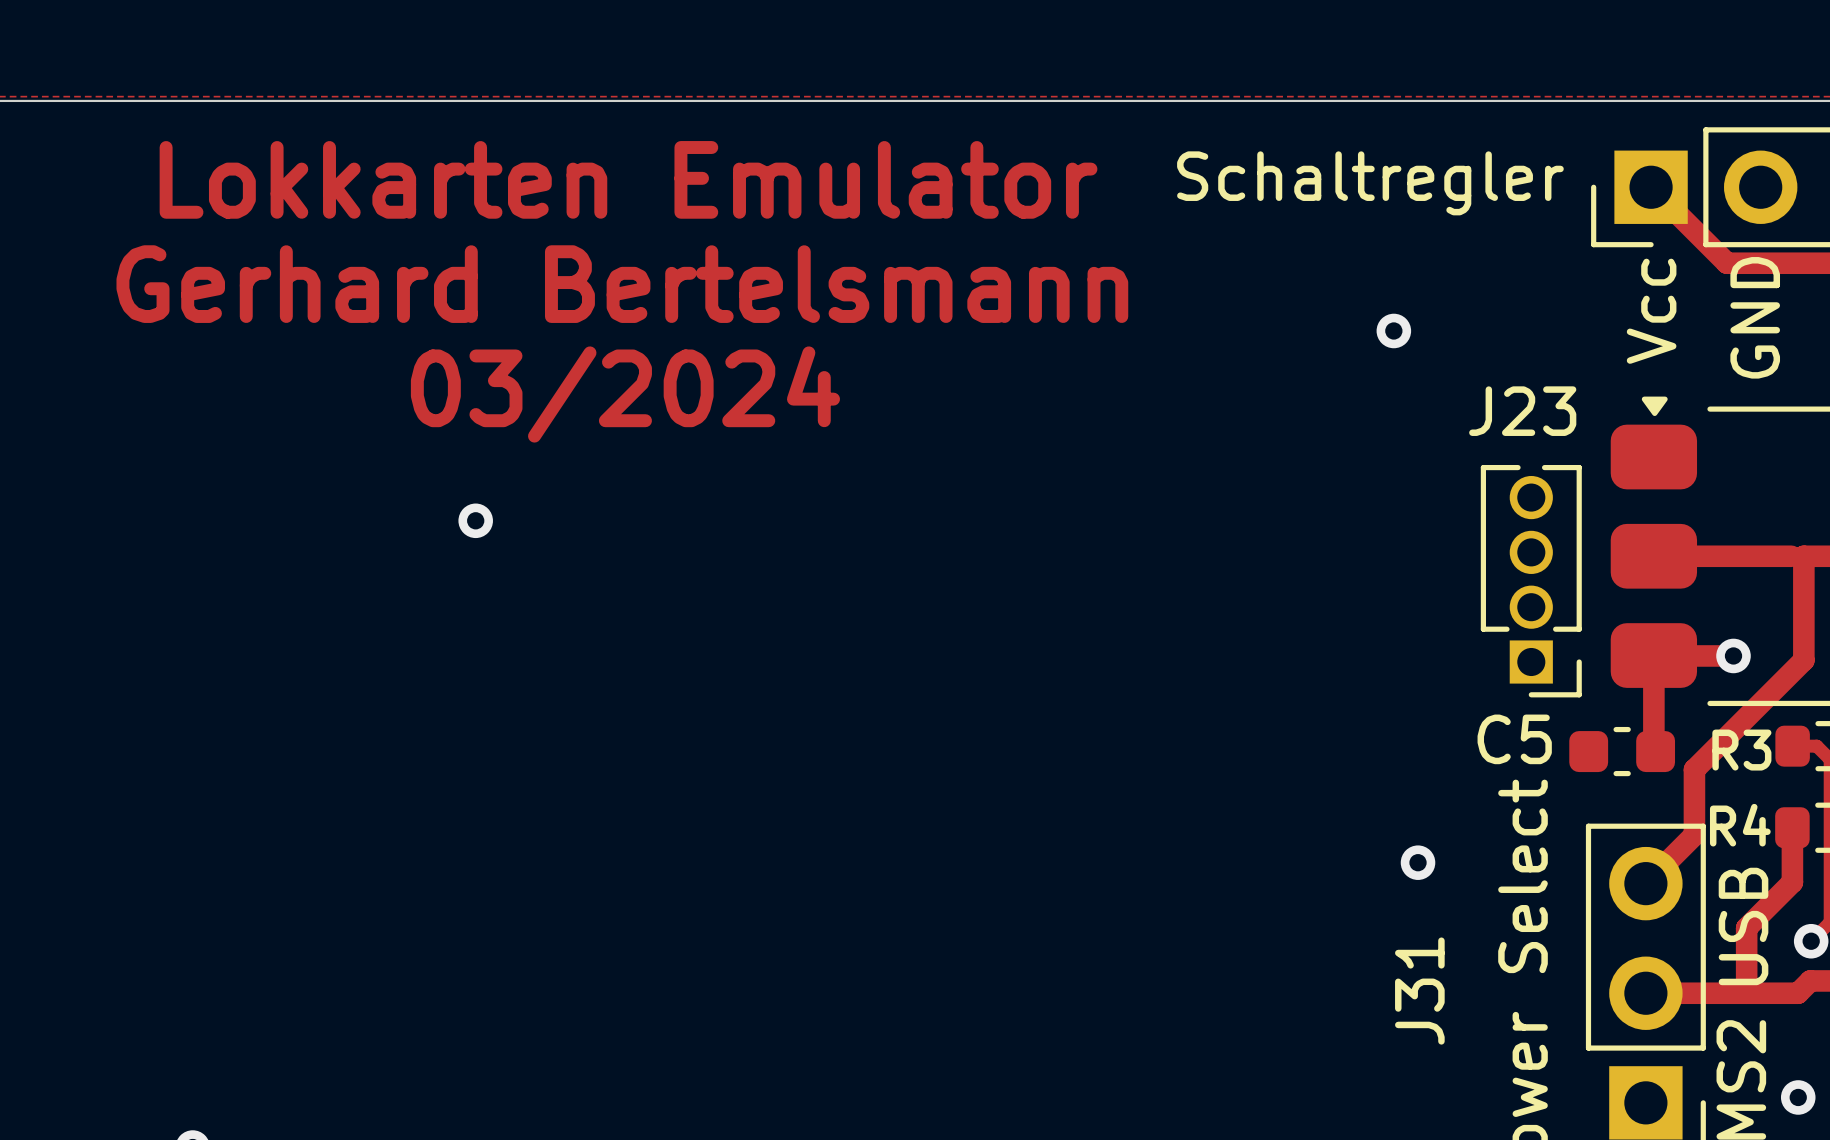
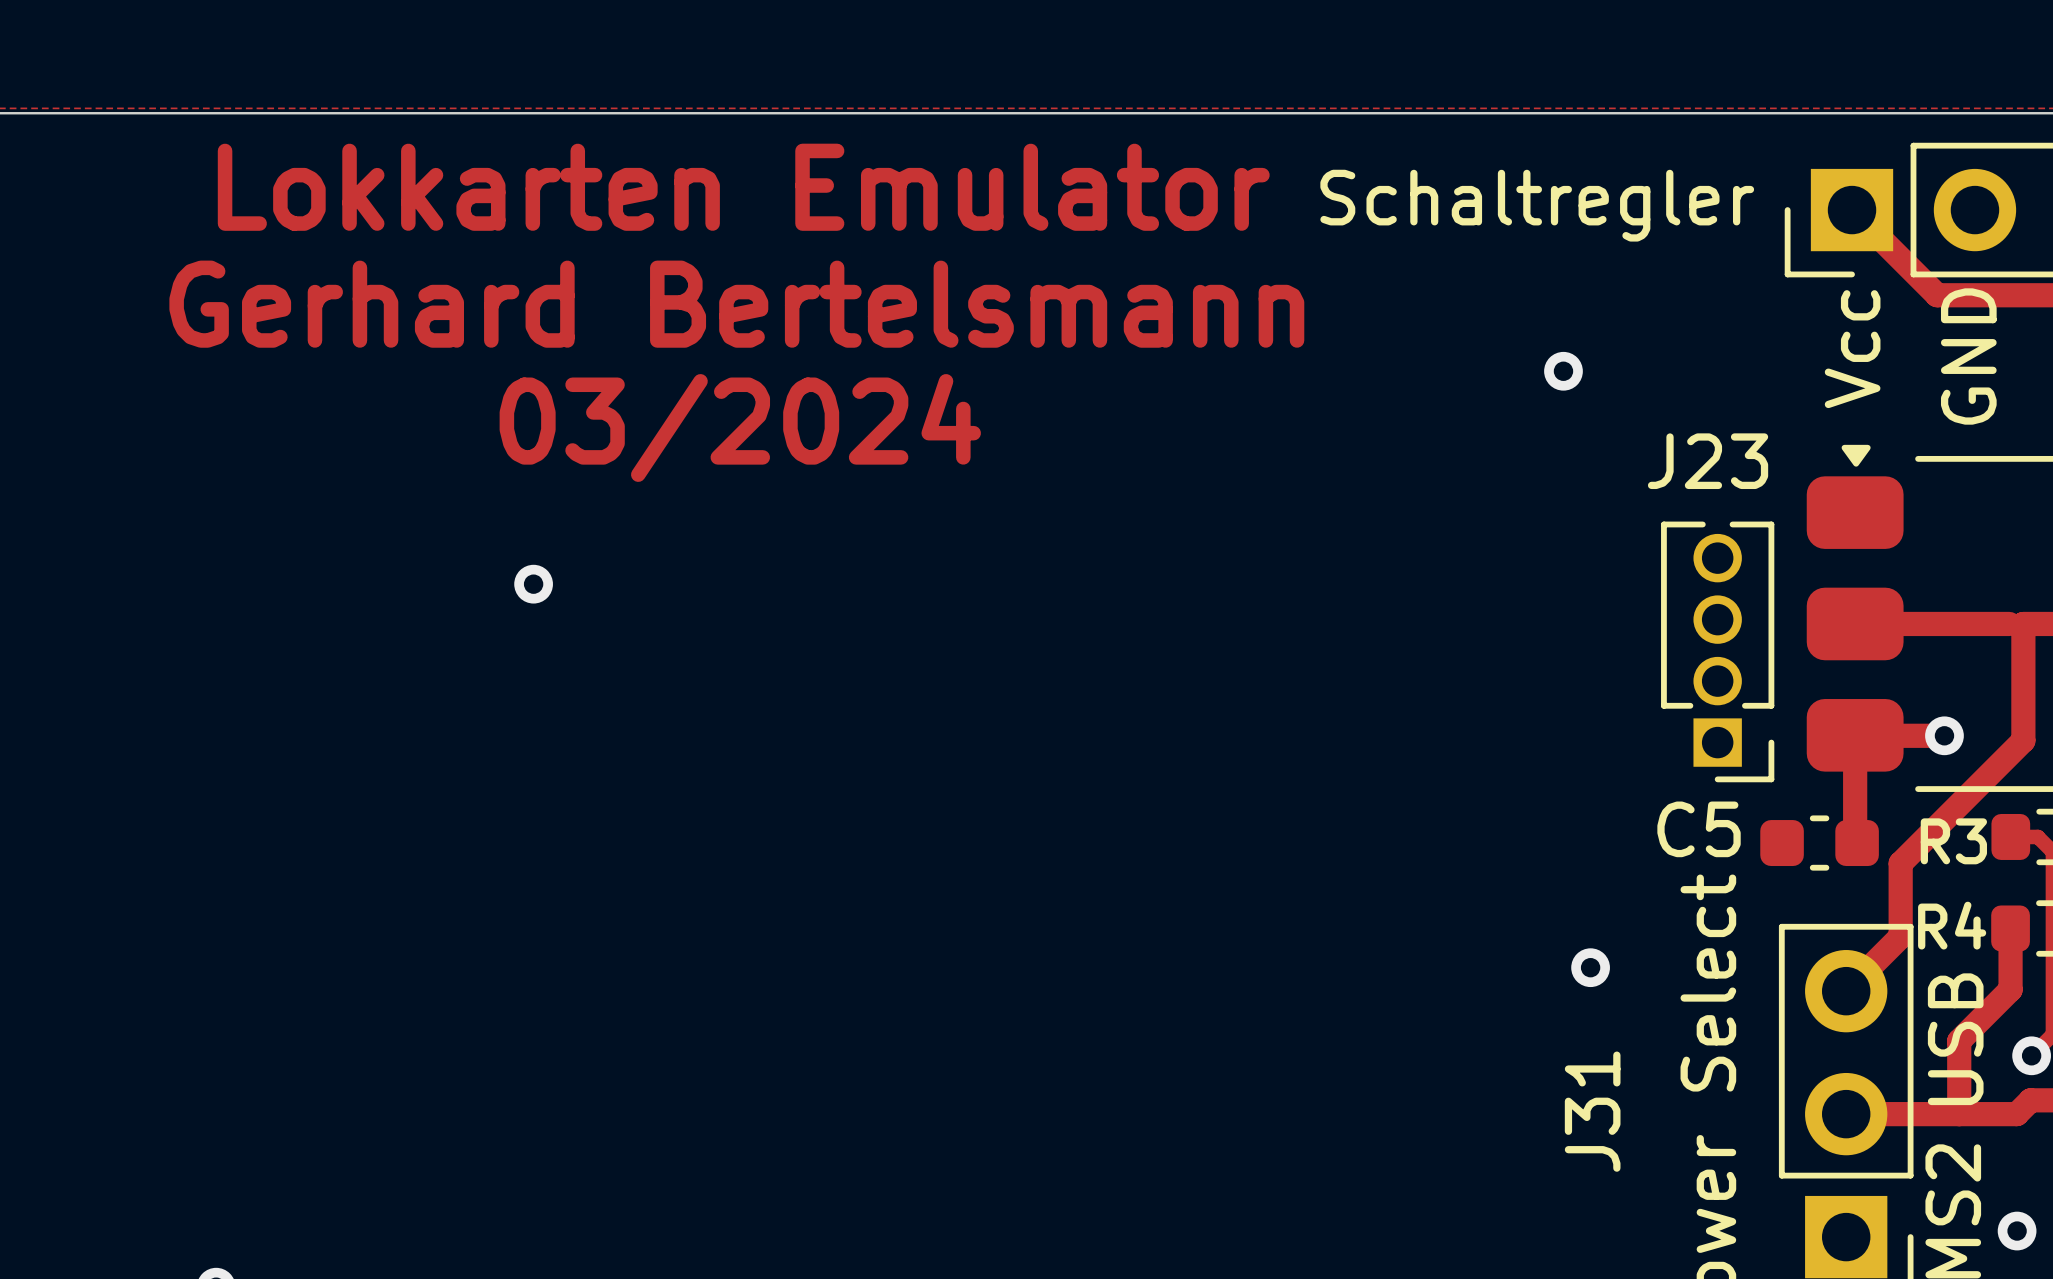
text position: Lokkarten Emulator (628, 179) -> Lokkarten Emulator (743, 187)
text position: Gerhard Bertelsmann (622, 284) -> Gerhard Bertelsmann (736, 304)
text position: 03/2024 (625, 394) -> 03/2024 (740, 427)

